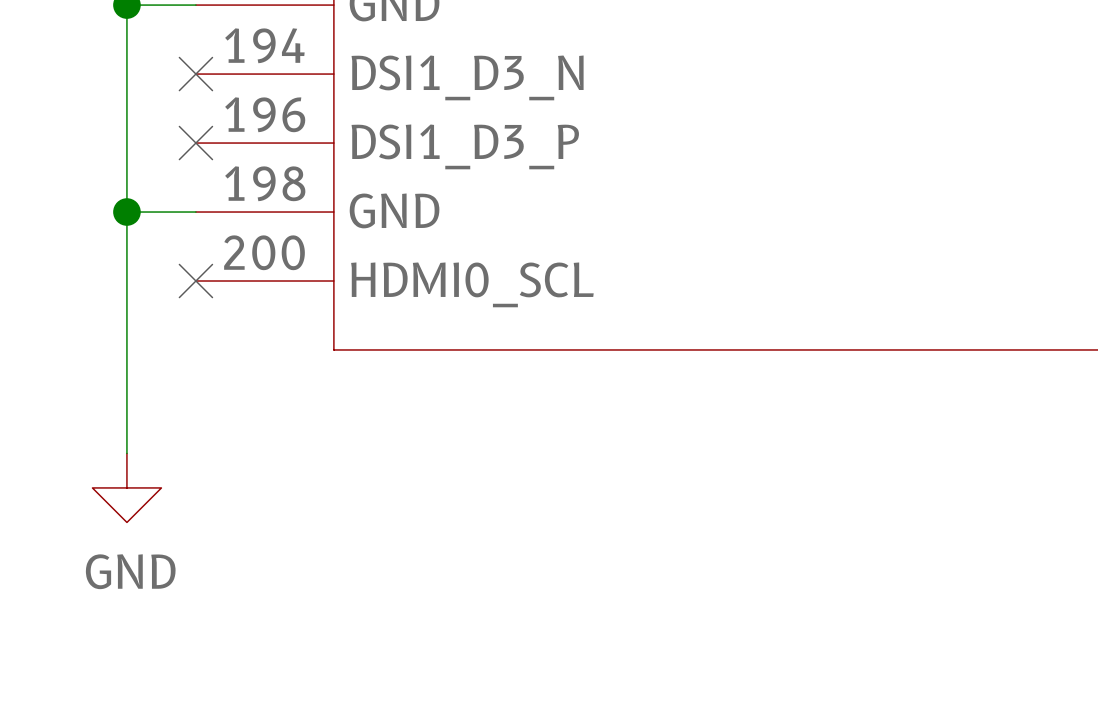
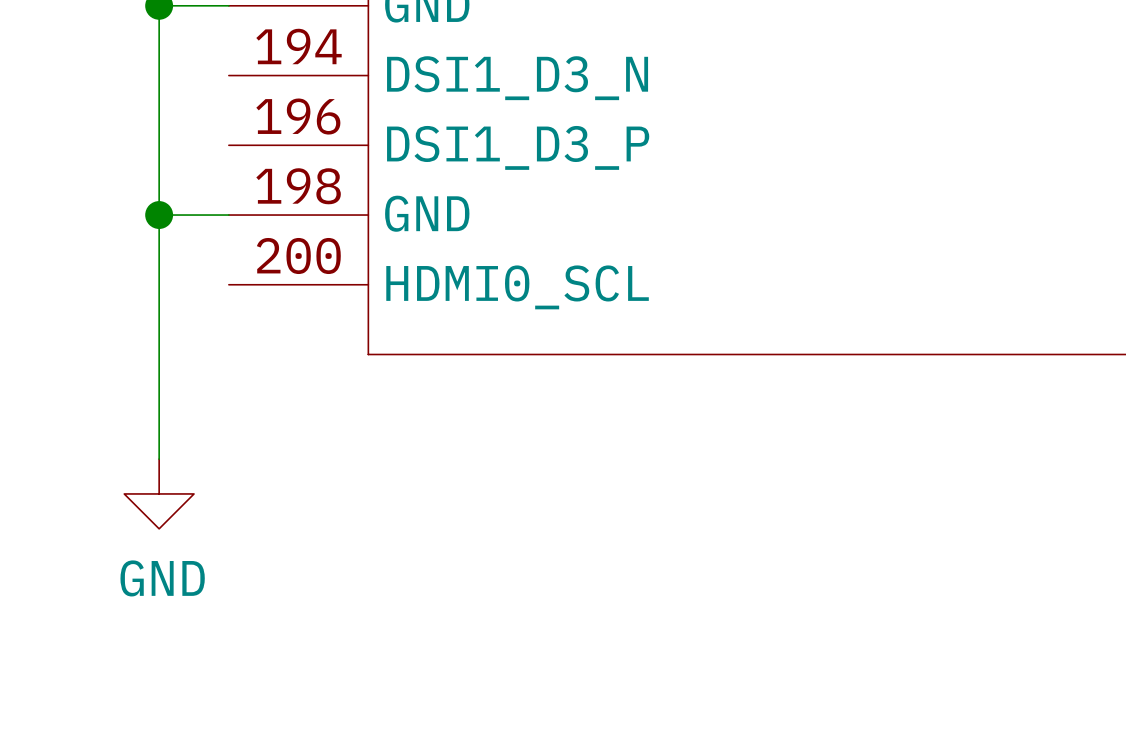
no-connect mark: (195, 74) -> none
no-connect mark: (195, 143) -> none
no-connect mark: (195, 281) -> none

